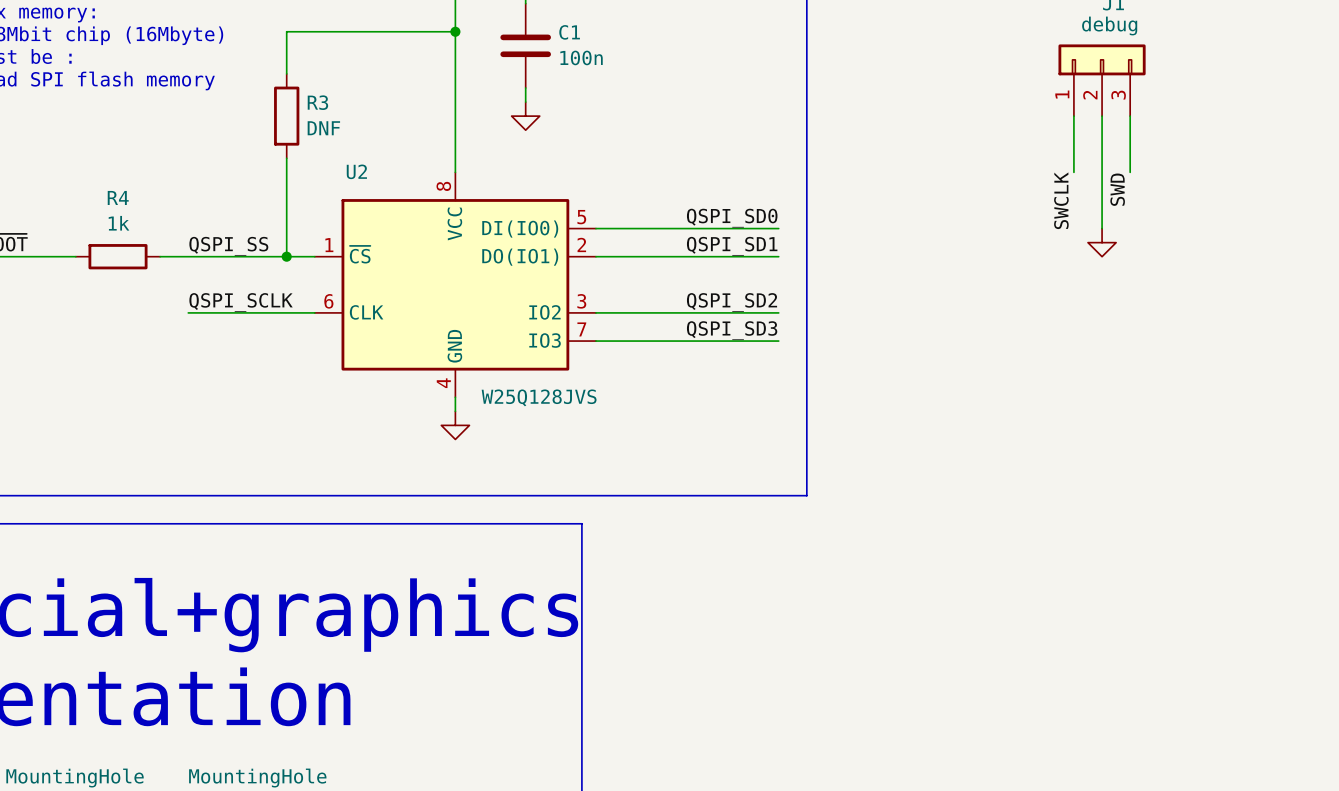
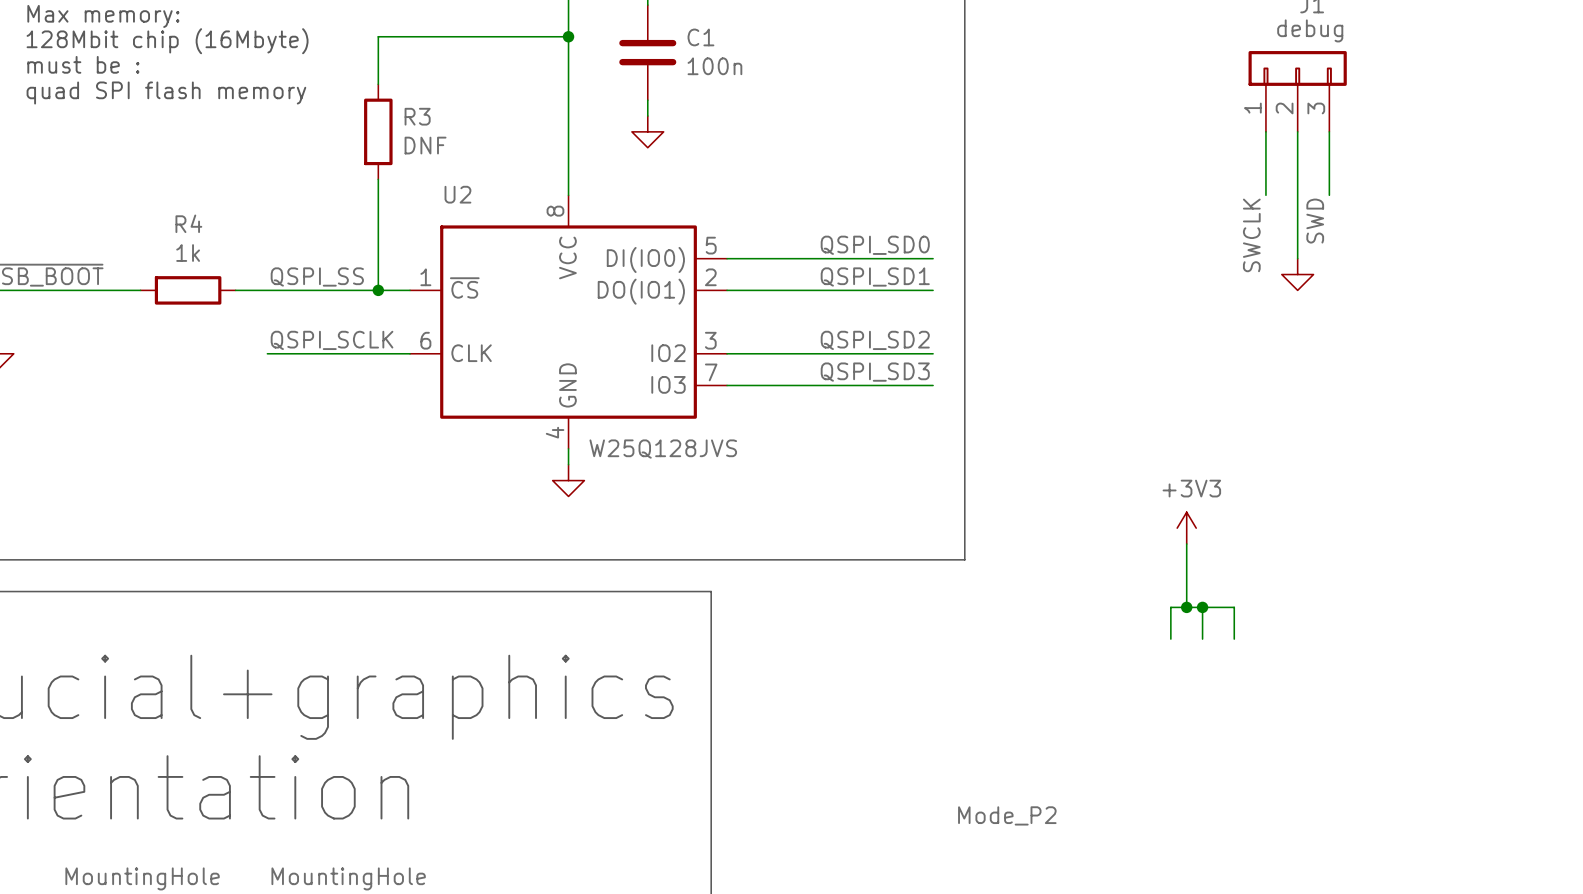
power symbol: none -> +3V3 (1186, 528)
wire: none -> (1186, 543) (1186, 607)
junction: none -> (1186, 607)
wire: none -> (1202, 607) (1202, 639)
junction: none -> (1202, 607)
wire: none -> (1170, 639) (1170, 607) (1234, 607) (1234, 639)
label: none -> Mode_P2 (1007, 815)

